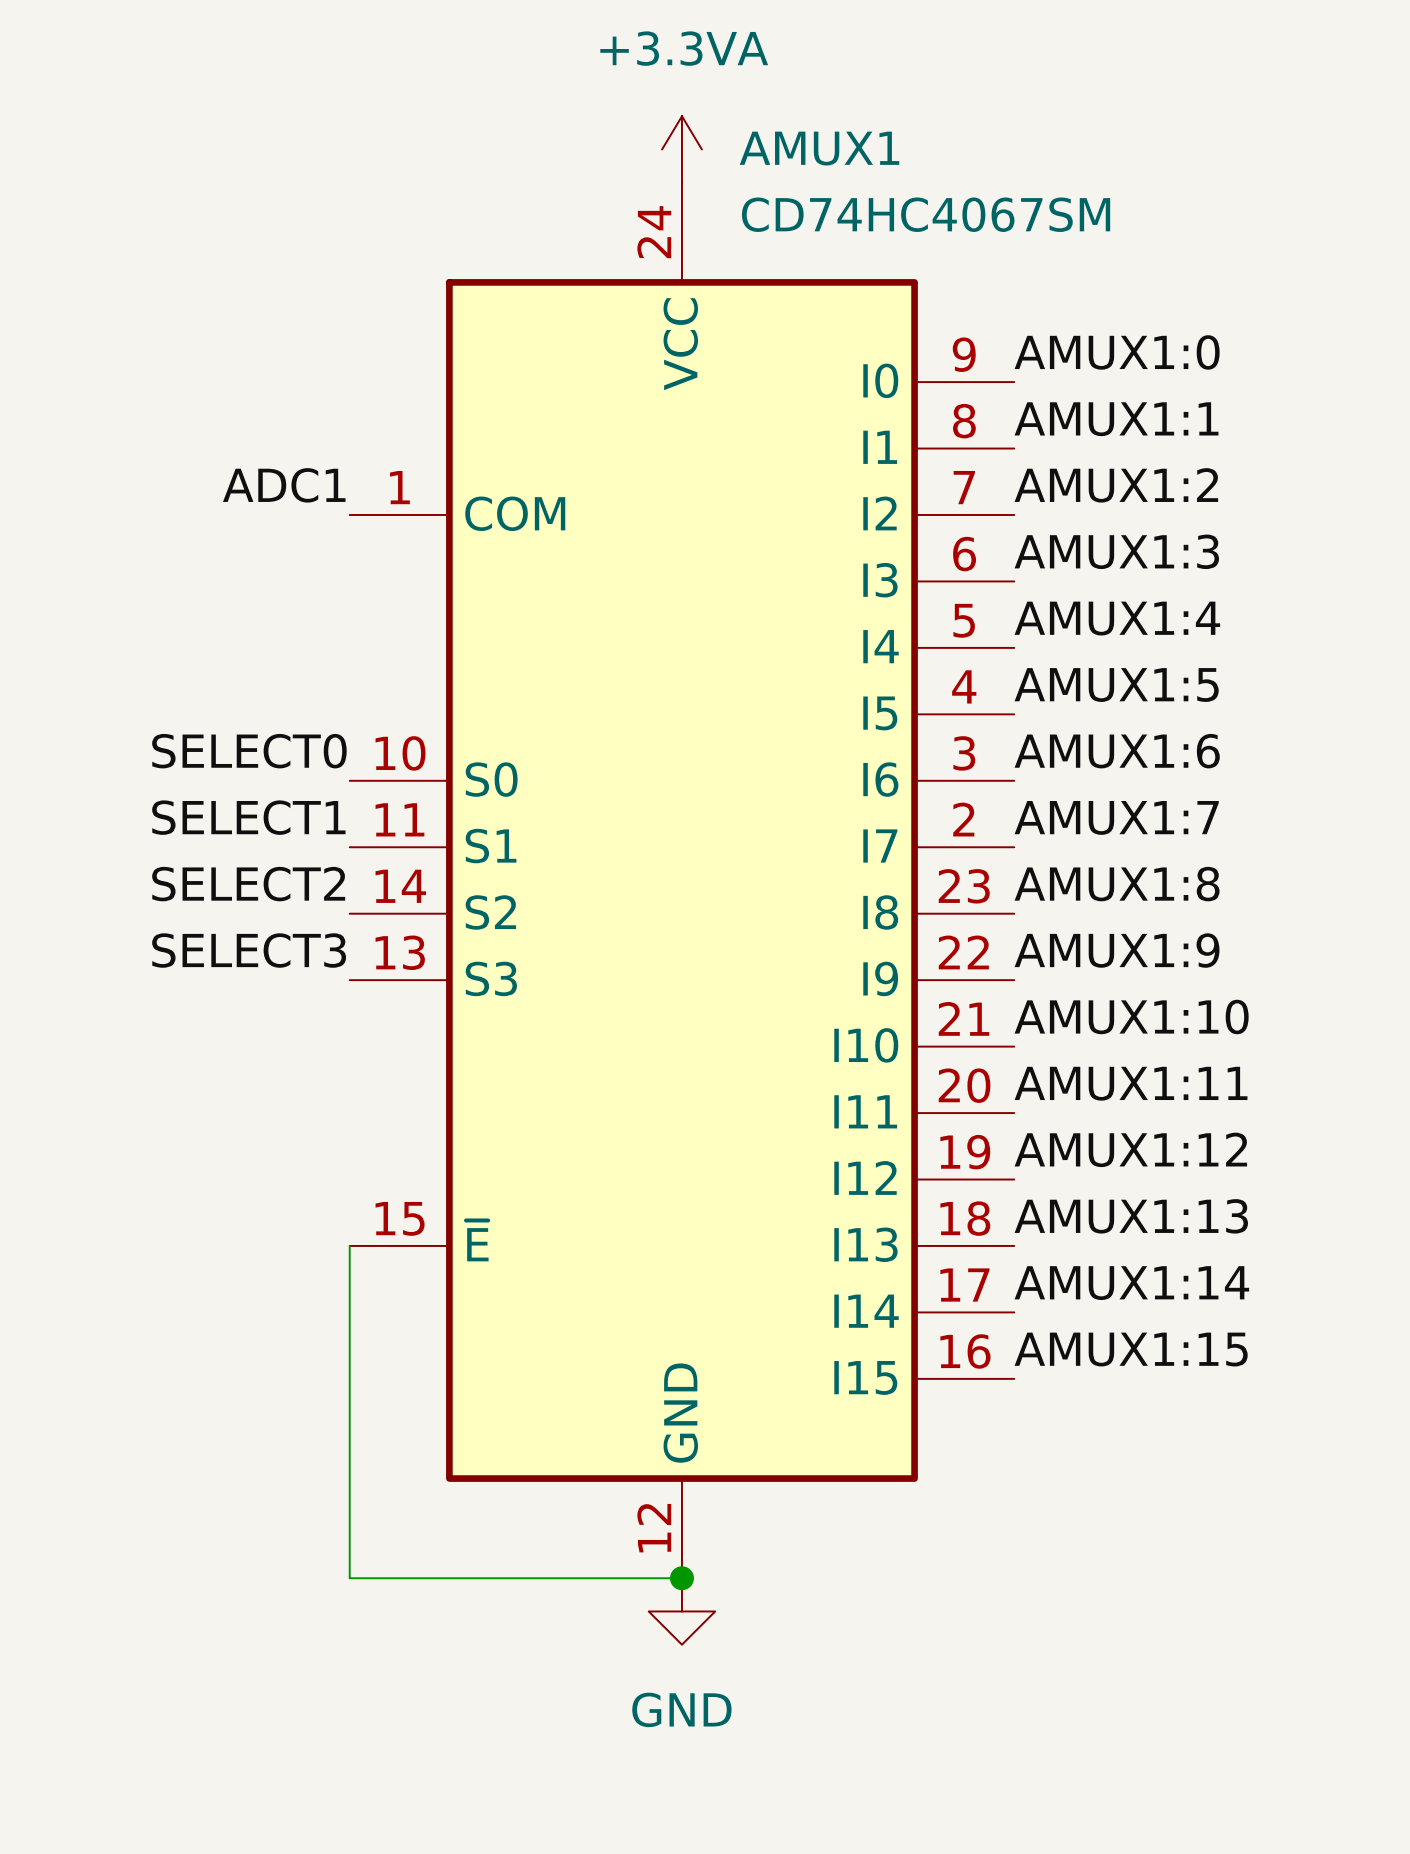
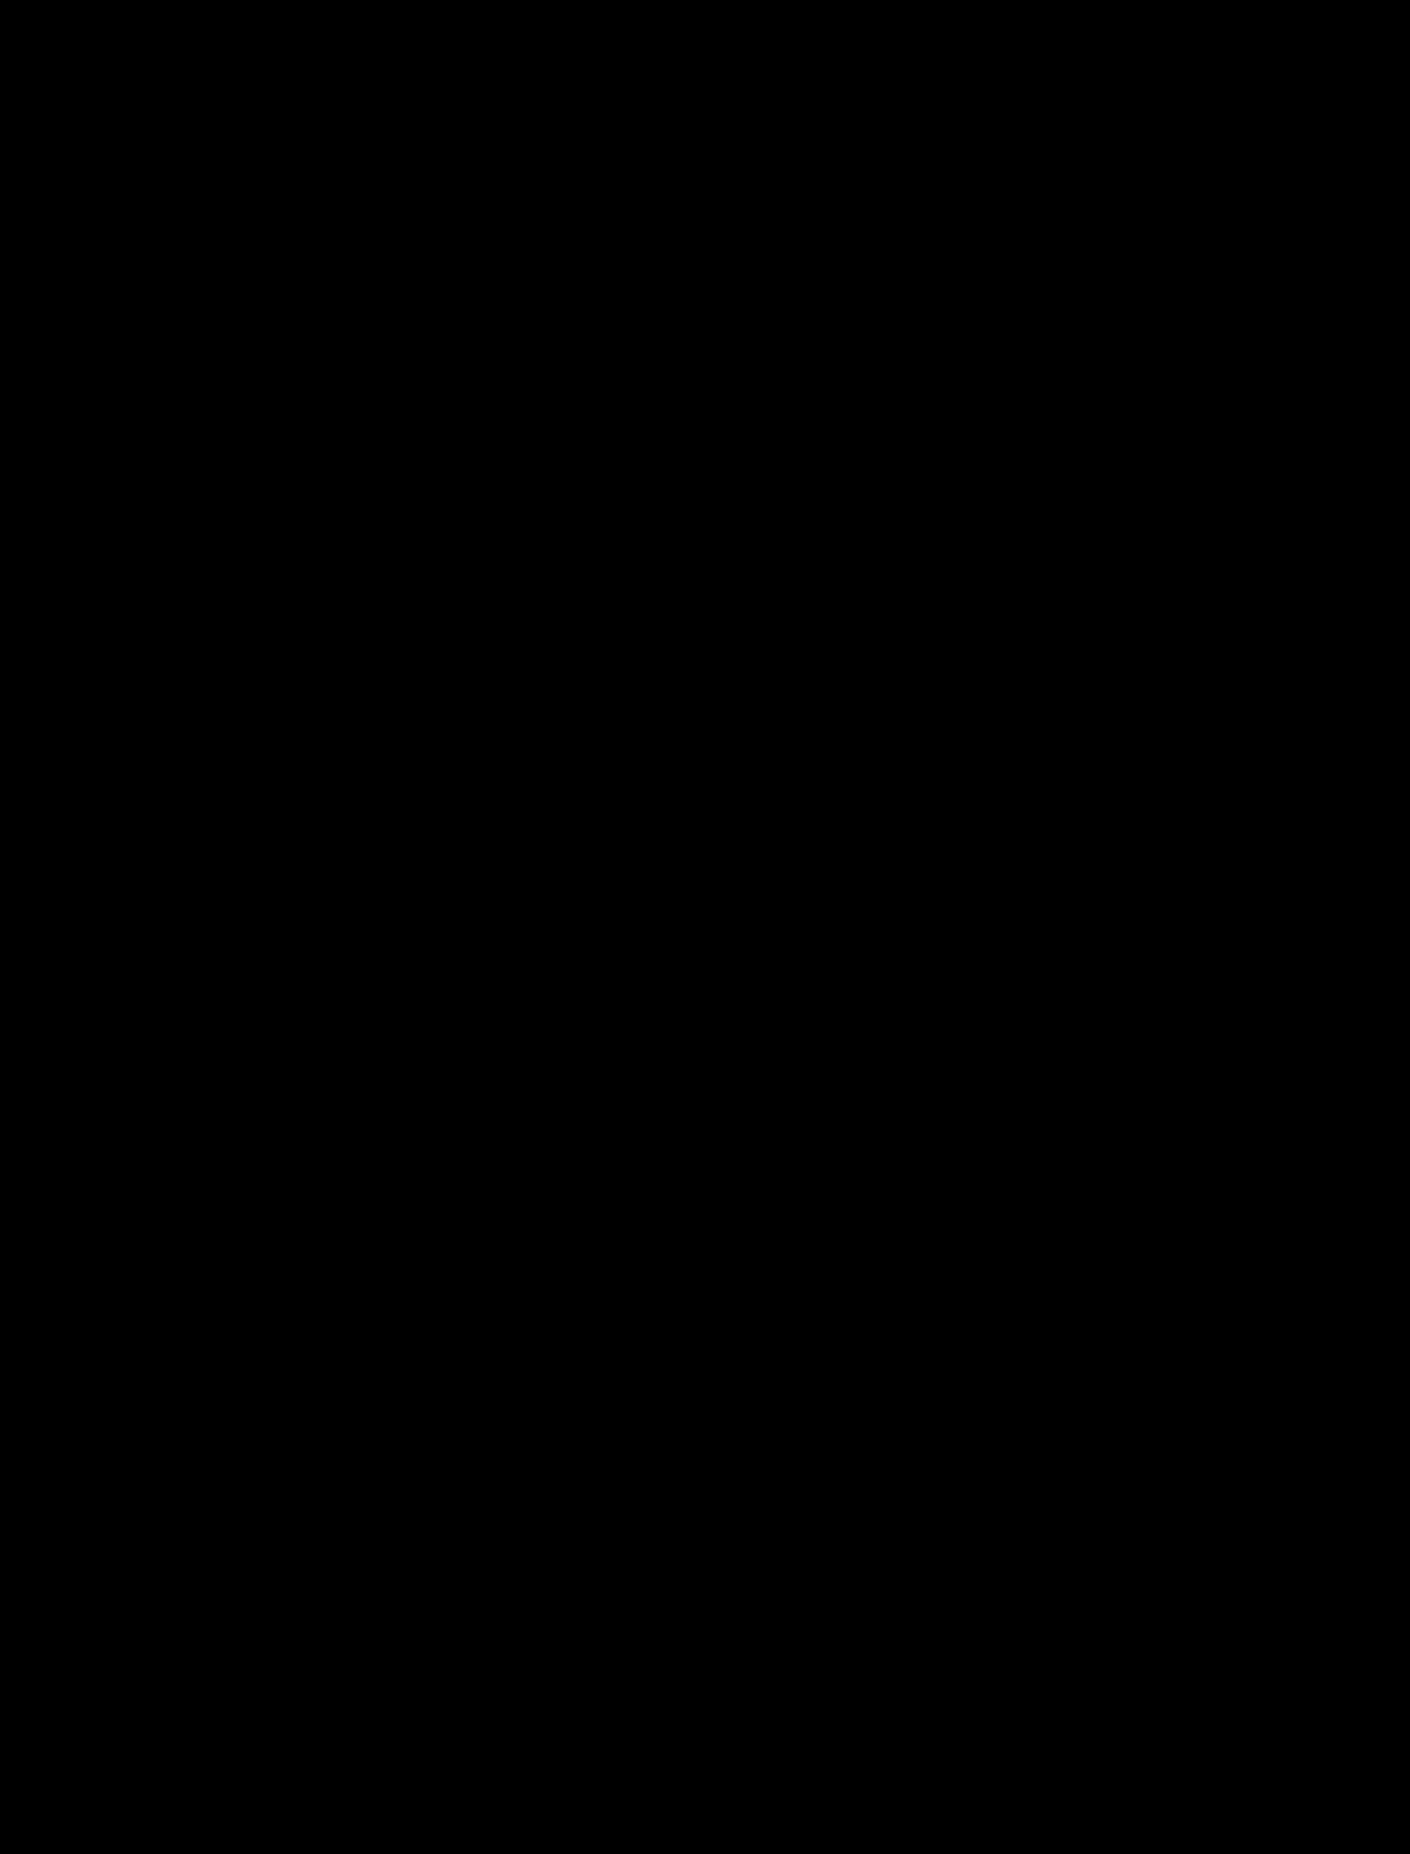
power symbol: +3.3VA (681, 149) -> none
label: AMUX1:0 (1117, 352) -> none
label: AMUX1:1 (1116, 419) -> none
label: ADC1 (284, 485) -> none
label: AMUX1:2 (1116, 485) -> none
label: AMUX1:3 (1116, 551) -> none
label: AMUX1:4 (1117, 618) -> none
label: AMUX1:5 (1116, 685) -> none
label: SELECT0 (249, 751) -> none
label: AMUX1:6 (1117, 751) -> none
label: SELECT1 (248, 817) -> none
label: AMUX1:7 (1116, 817) -> none
AMUX1: CD74HC4067SM (681, 880) -> none
label: SELECT2 (248, 884) -> none
label: AMUX1:8 (1117, 884) -> none
label: SELECT3 (249, 950) -> none
label: AMUX1:9 (1117, 950) -> none
label: AMUX1:10 (1131, 1016) -> none
label: AMUX1:11 (1131, 1083) -> none
label: AMUX1:12 (1130, 1149) -> none
label: AMUX1:13 (1131, 1216) -> none
wire: (349, 1245) (349, 1578) (681, 1578) -> none
label: AMUX1:14 (1131, 1283) -> none
label: AMUX1:15 (1131, 1349) -> none
junction: (681, 1578) -> none
power symbol: GND (681, 1611) -> none

